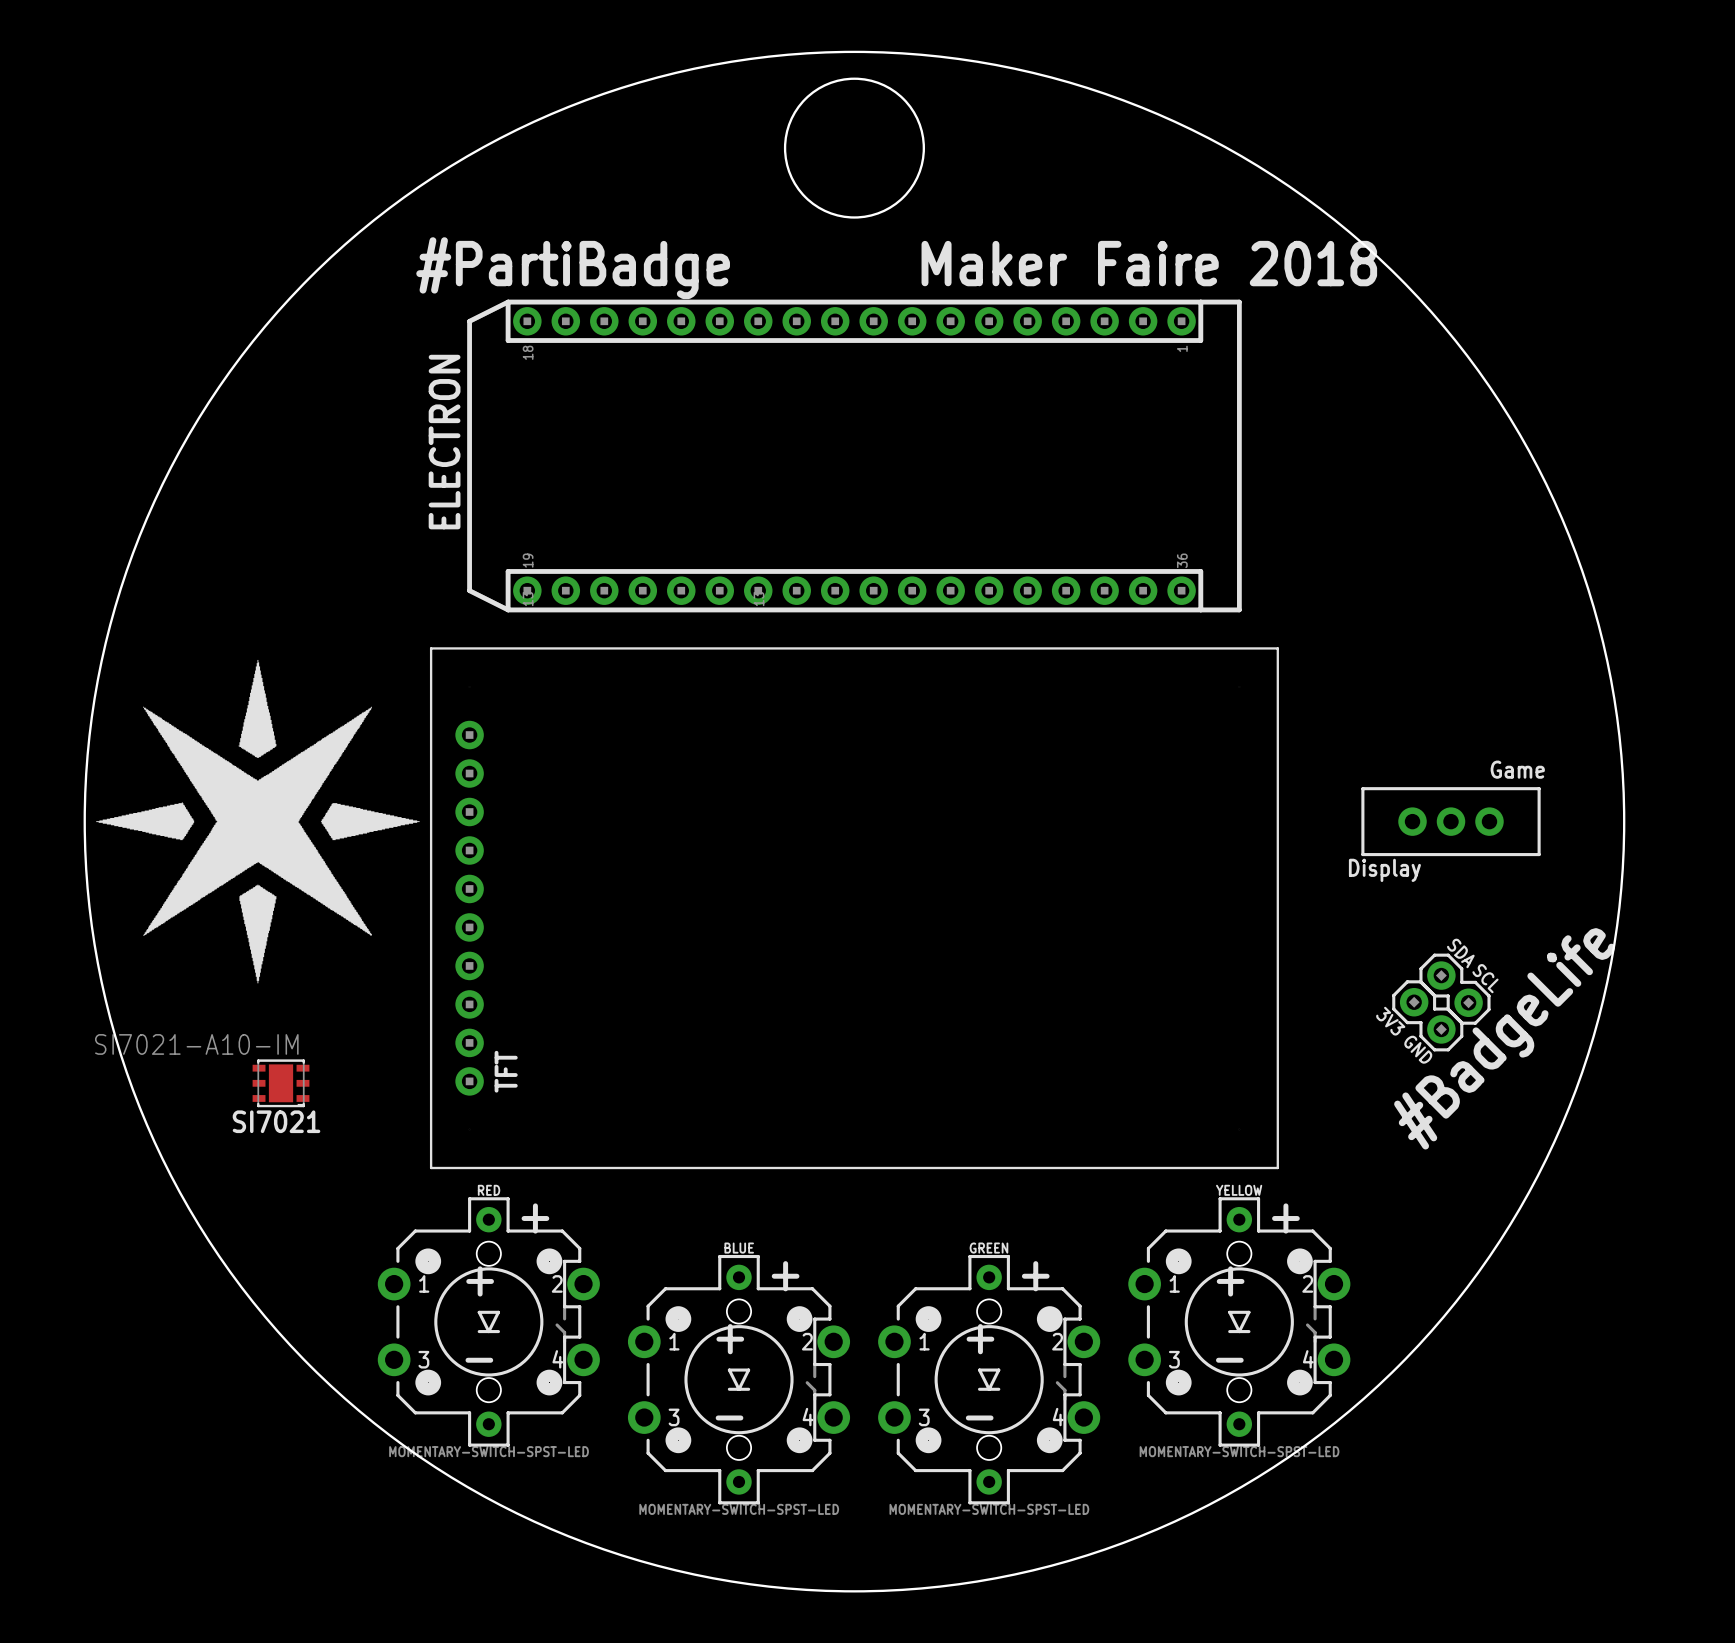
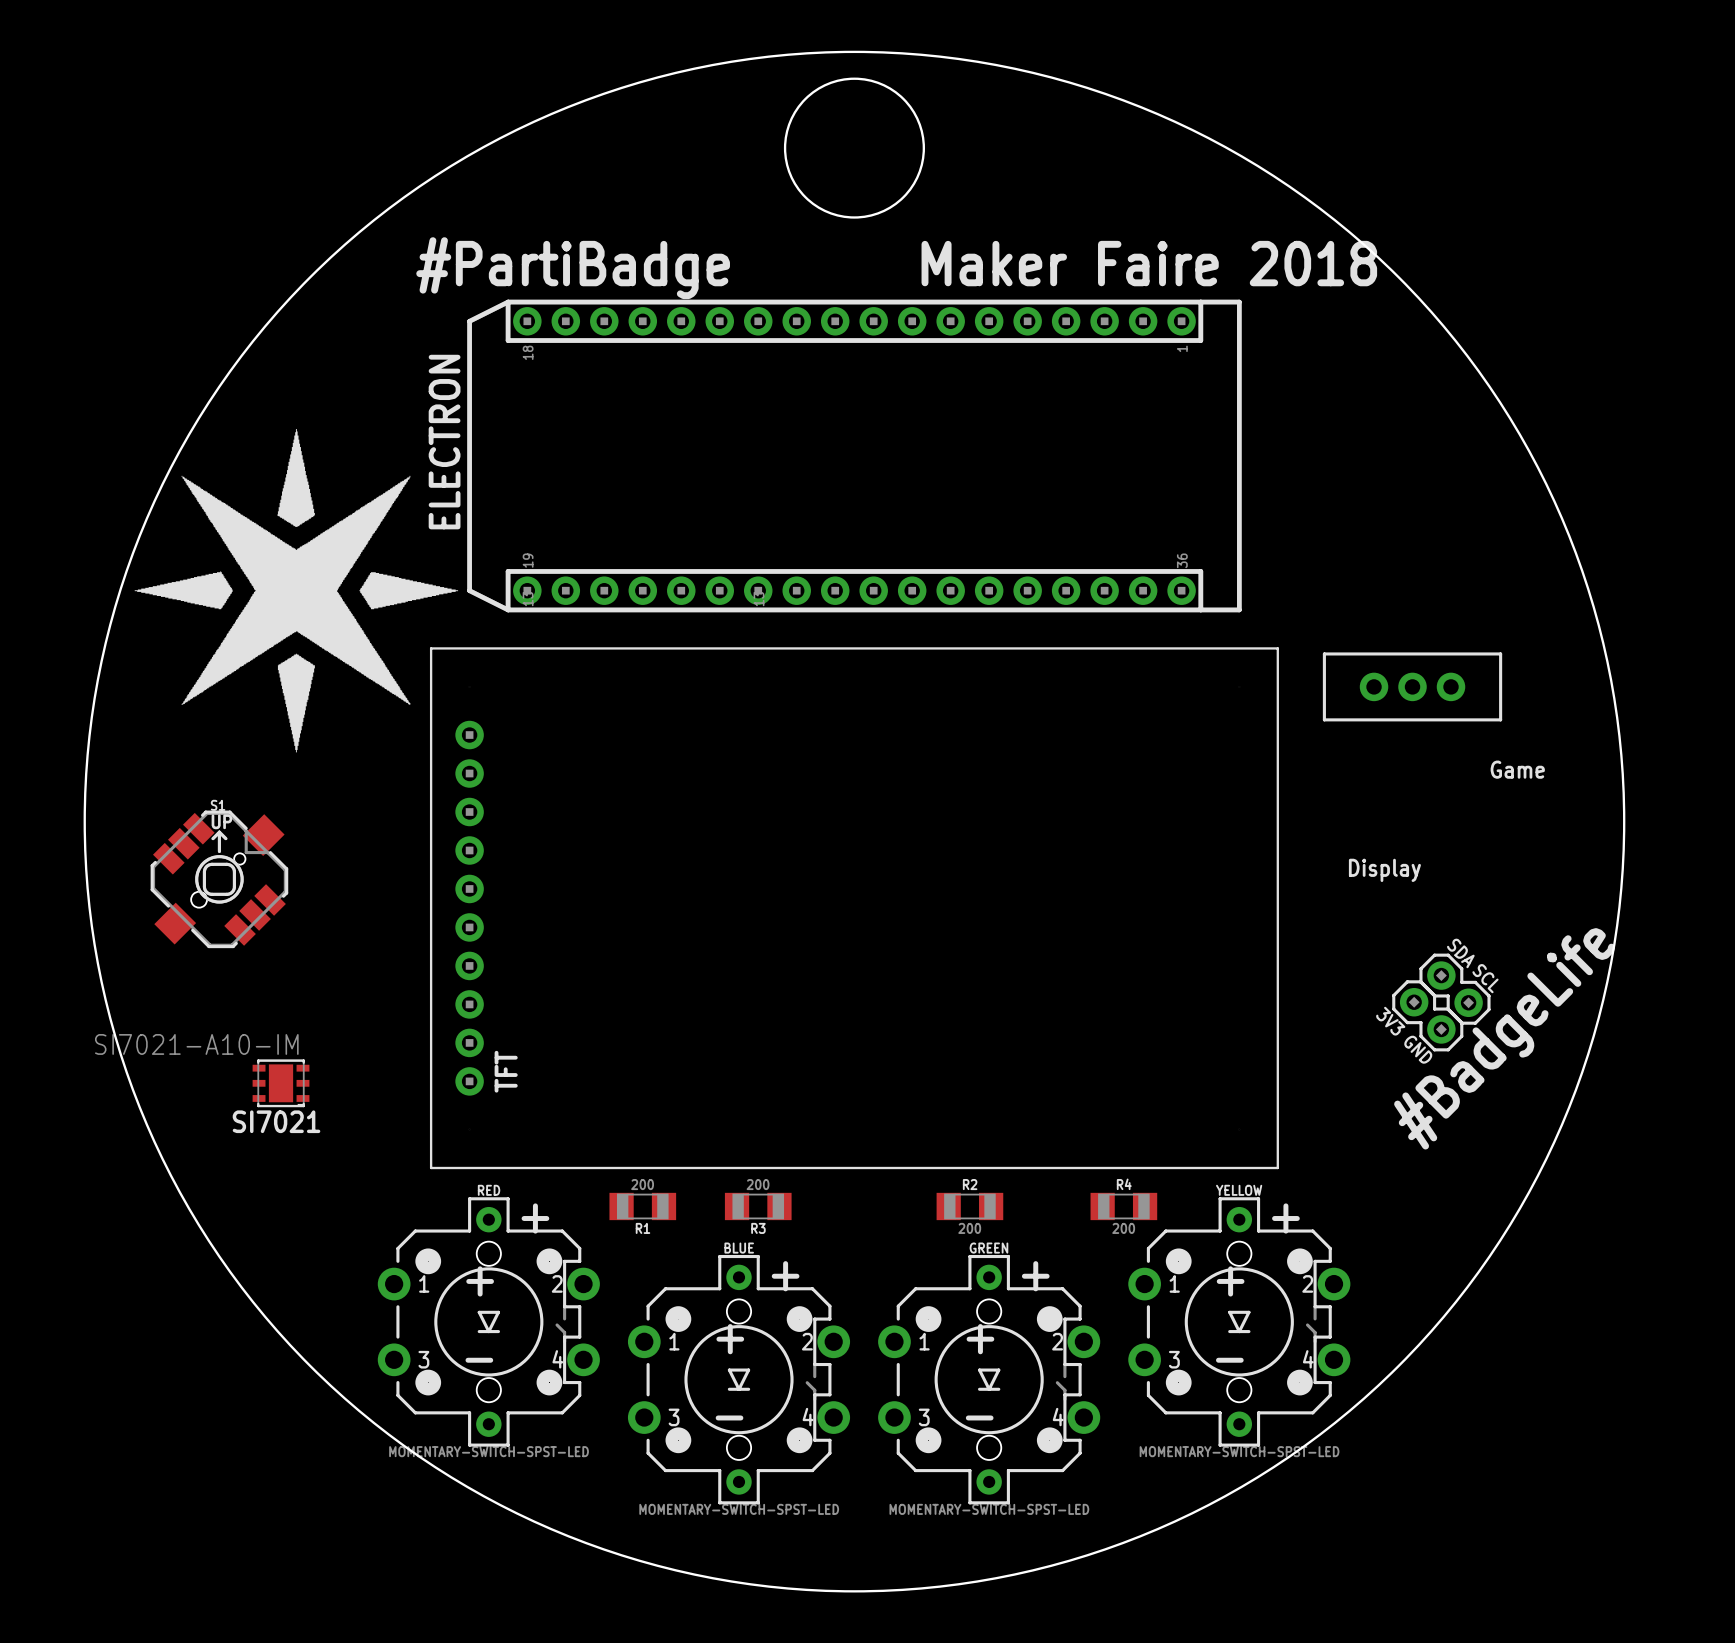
drawing position: (257, 821) -> (296, 590)
part position: (1451, 821) -> (1412, 686)
S1: none -> (219, 879)
R1: none -> 200 (642, 1206)
R3: none -> 200 (758, 1206)
R2: none -> 200 (969, 1206)
R4: none -> 200 (1123, 1206)

